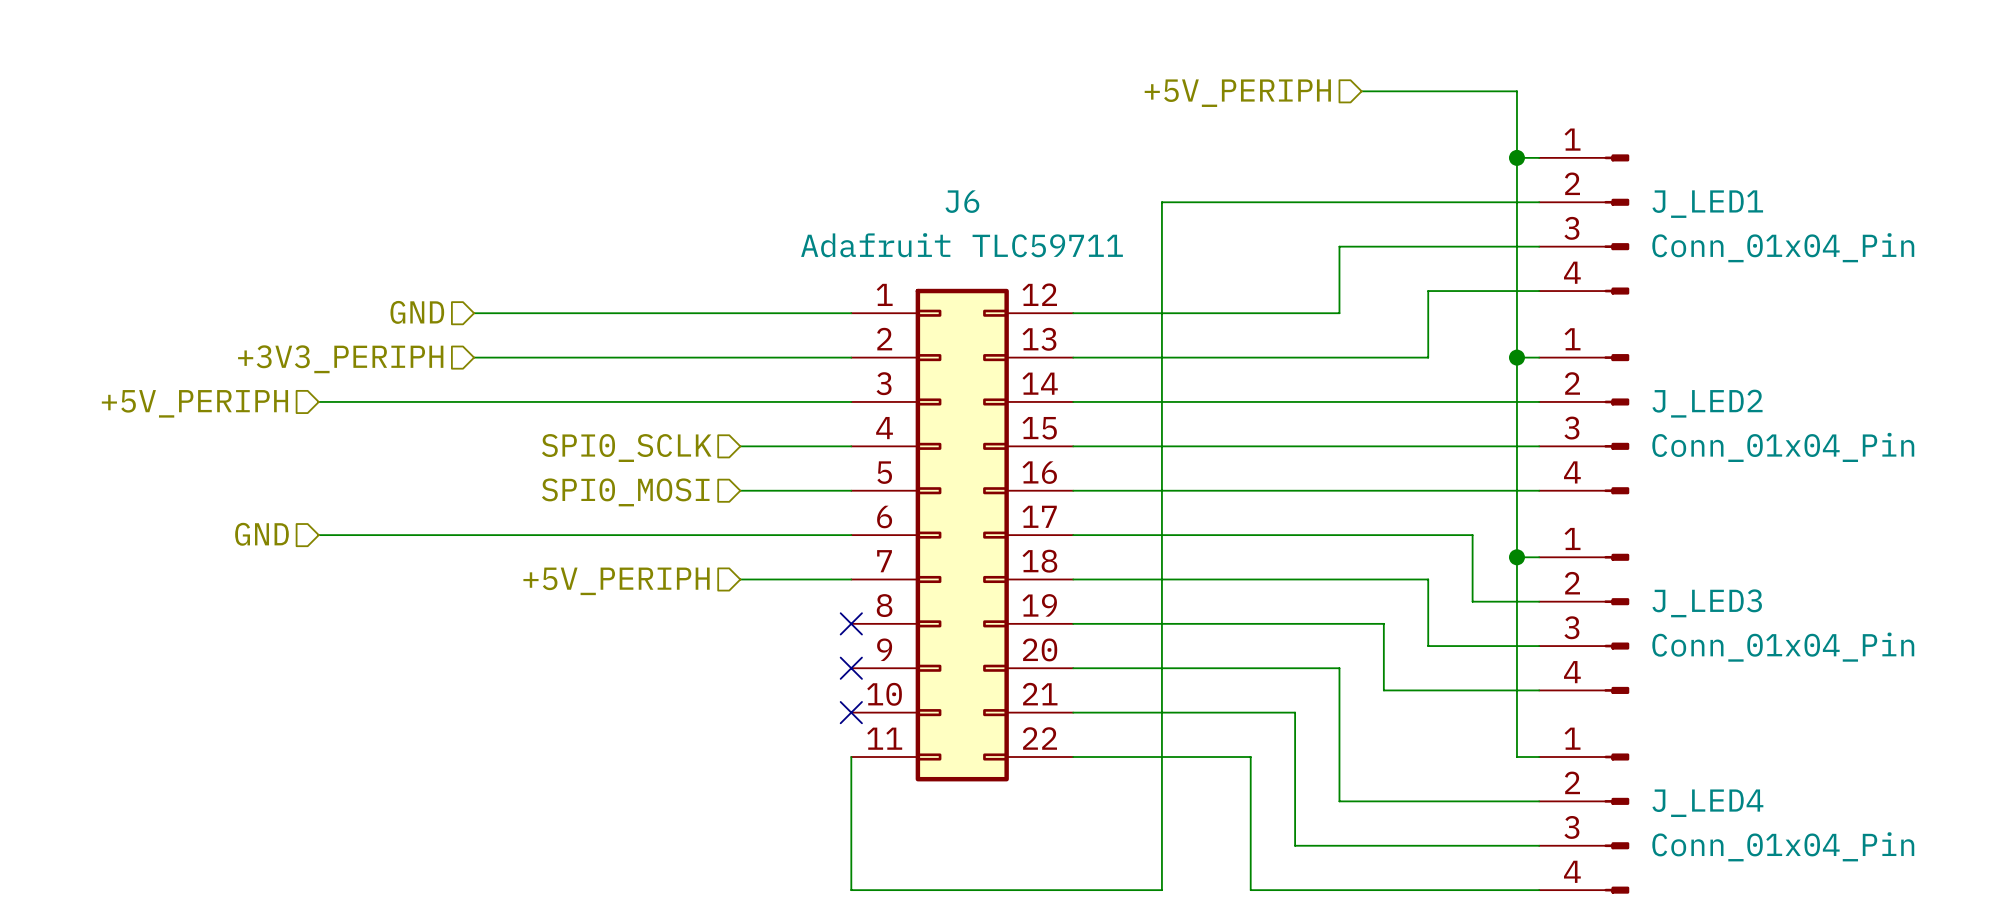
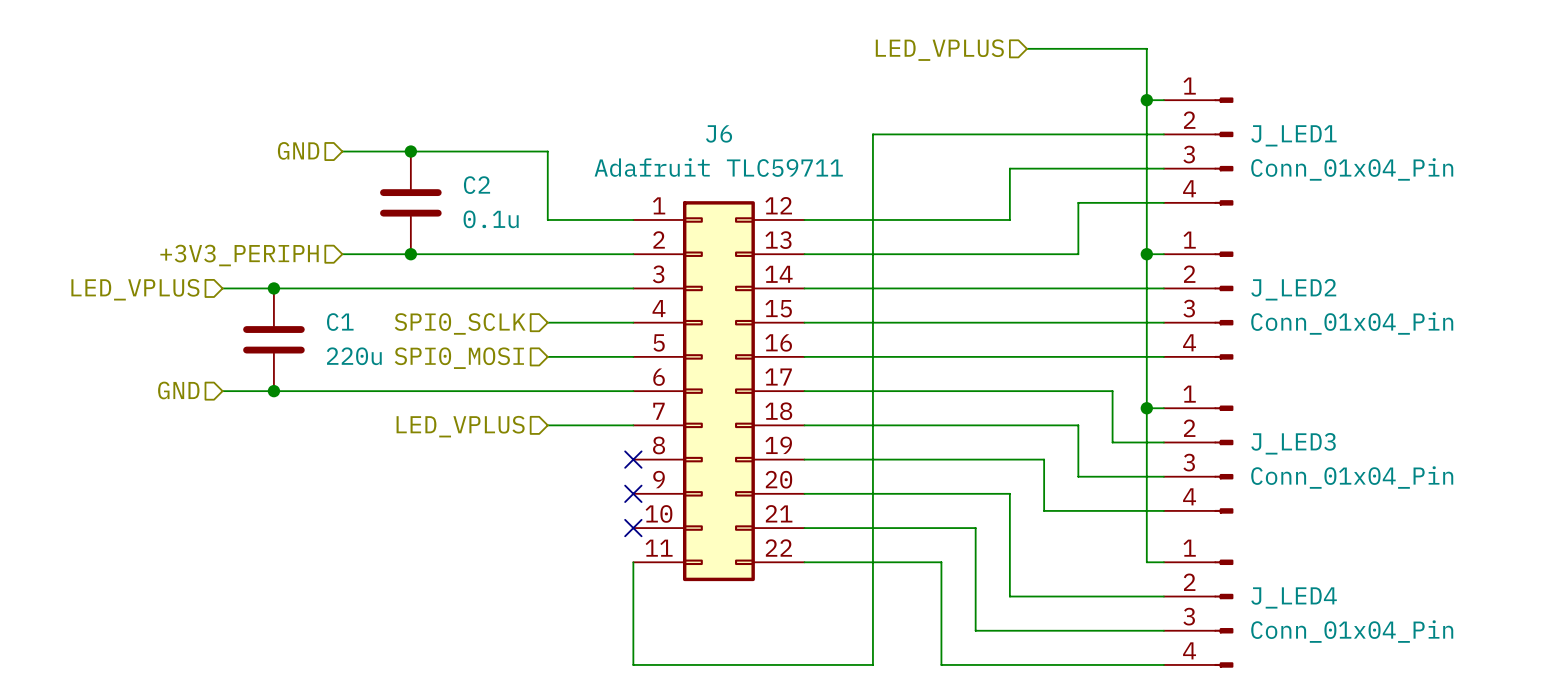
hierarchical label: +5V_PERIPH (1237, 93) -> LED_VPLUS (939, 50)
junction: none -> (410, 151)
C2: none -> 0.1u (410, 202)
hierarchical label position: GND (417, 312) -> GND (298, 150)
wire: (474, 313) (740, 313) -> (342, 151) (547, 151) (547, 219)
junction: none -> (410, 254)
junction: none -> (273, 288)
hierarchical label: +5V_PERIPH (194, 403) -> LED_VPLUS (135, 289)
C1: none -> 220u (273, 339)
junction: none -> (273, 391)
hierarchical label: +5V_PERIPH (616, 581) -> LED_VPLUS (460, 426)

